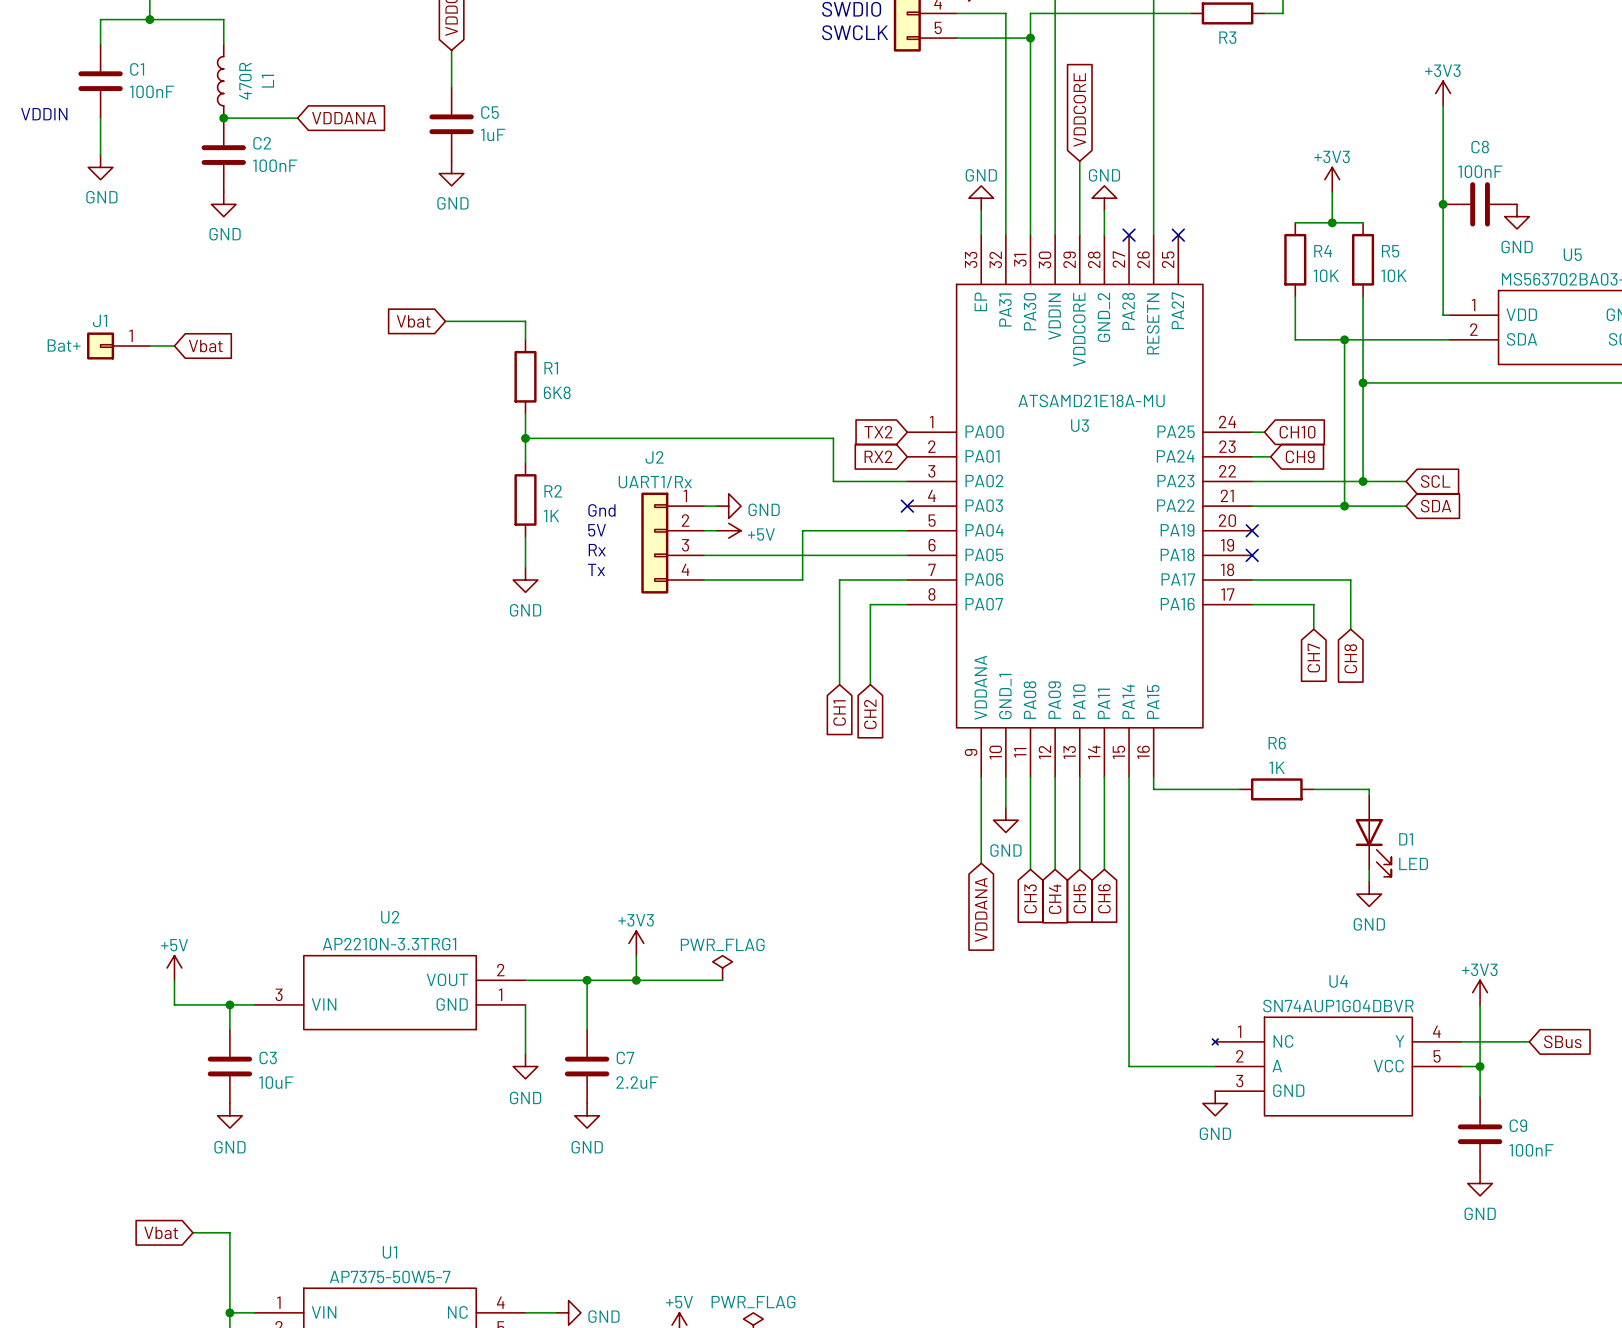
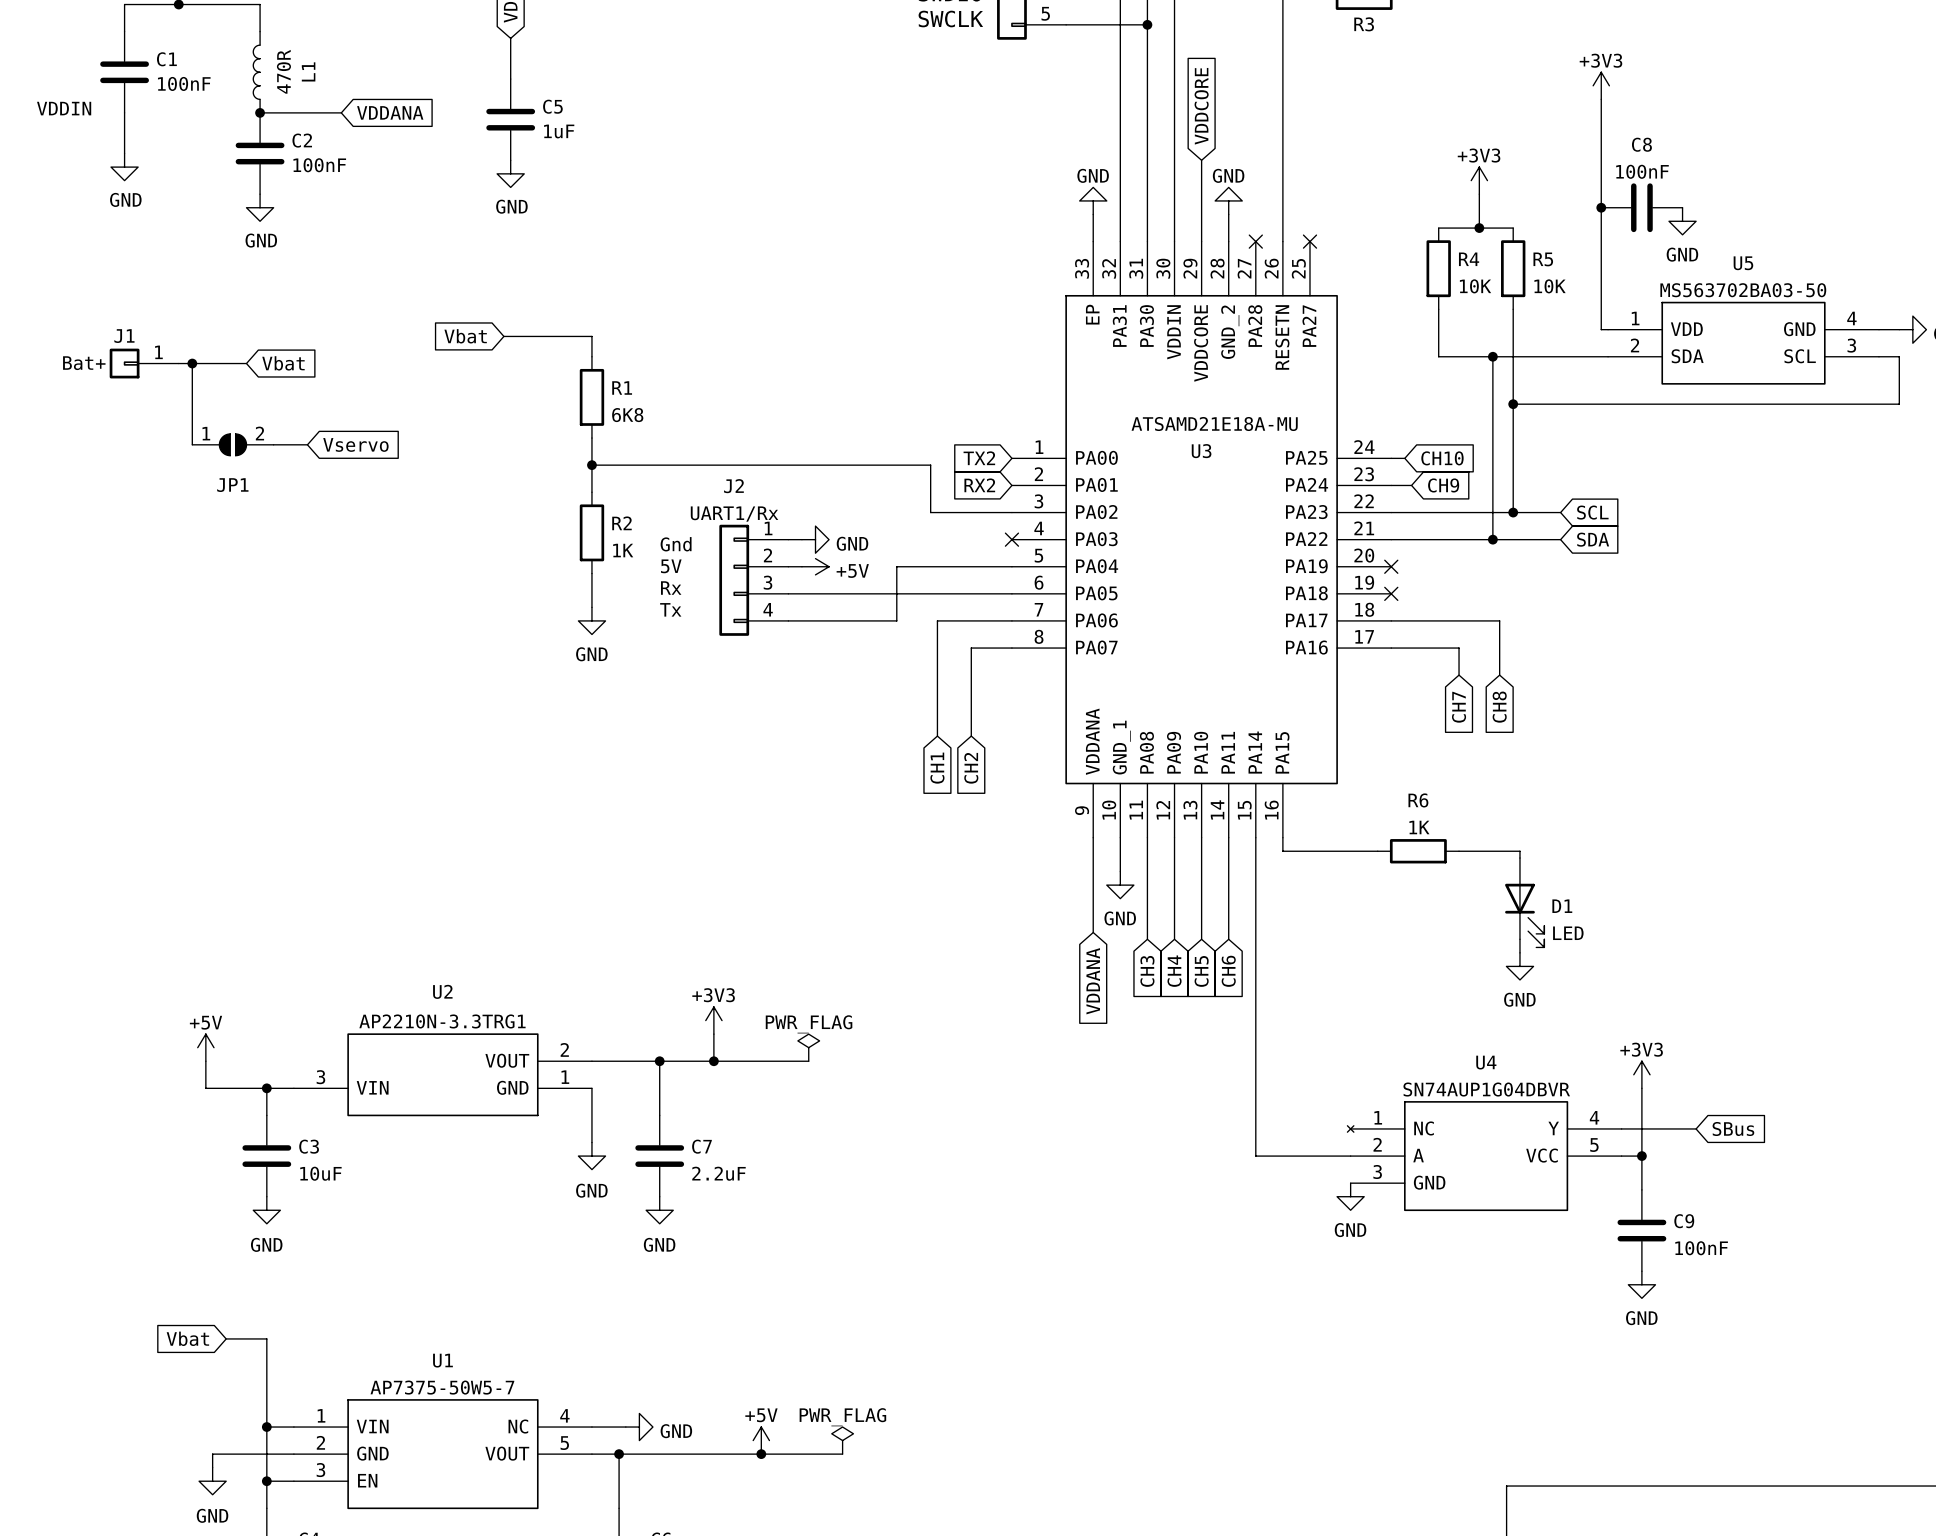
wire: none -> (192, 363) (192, 444)
junction: none -> (192, 363)
wire: none -> (205, 363) (246, 363)
global label position: Vbat (205, 346) -> Vbat (283, 363)
JP1: none -> (232, 444)
wire: none -> (273, 444) (307, 444)
global label: none -> Vservo (355, 444)

